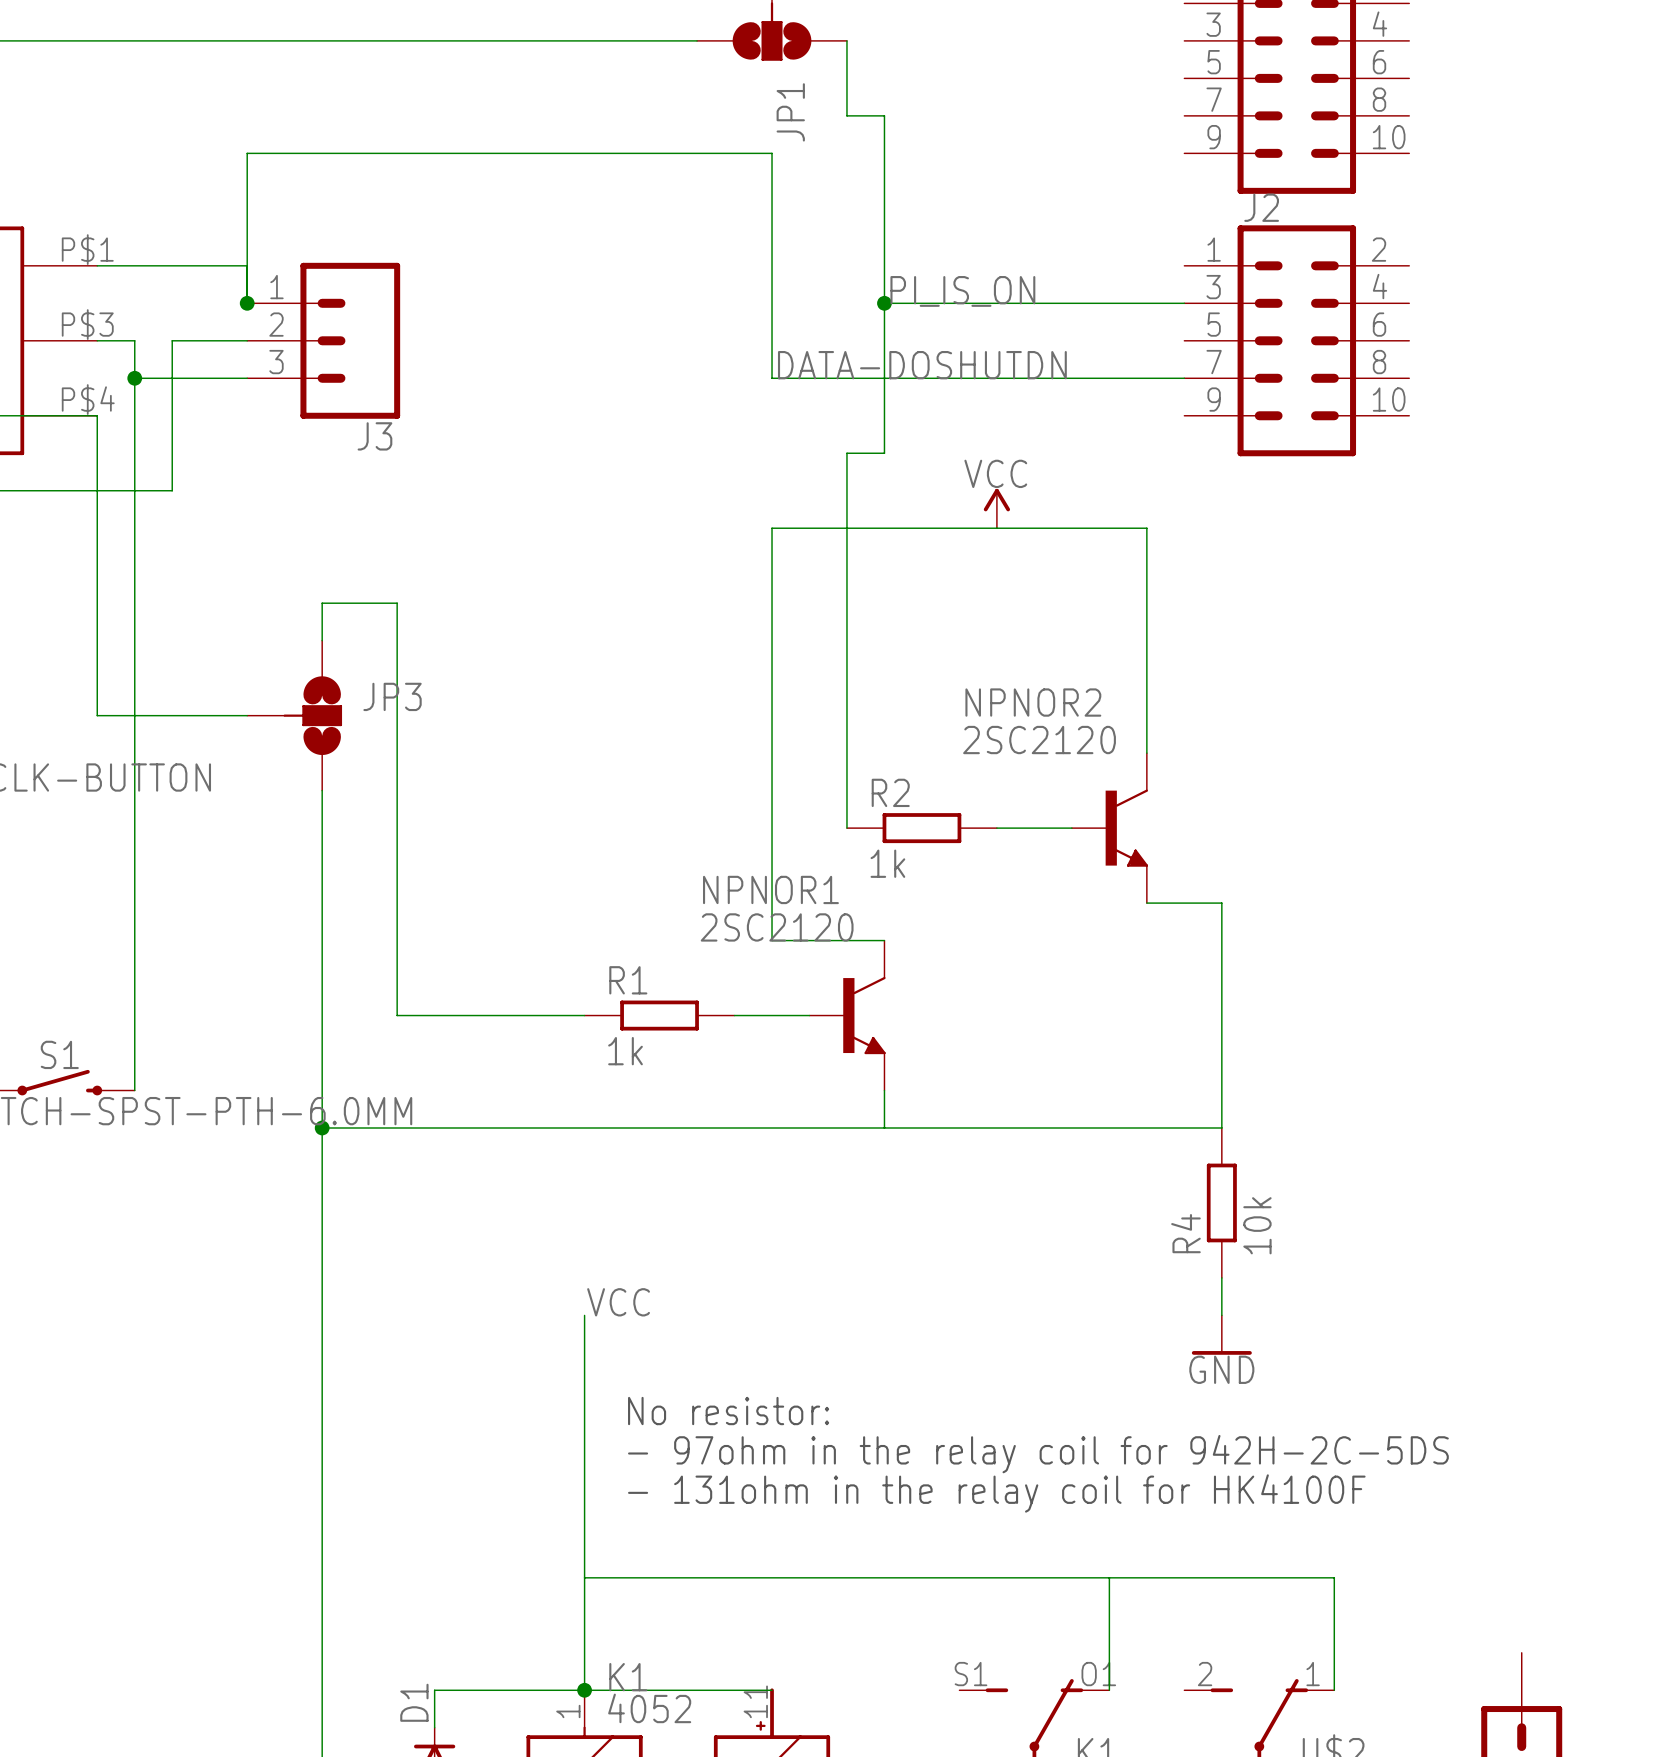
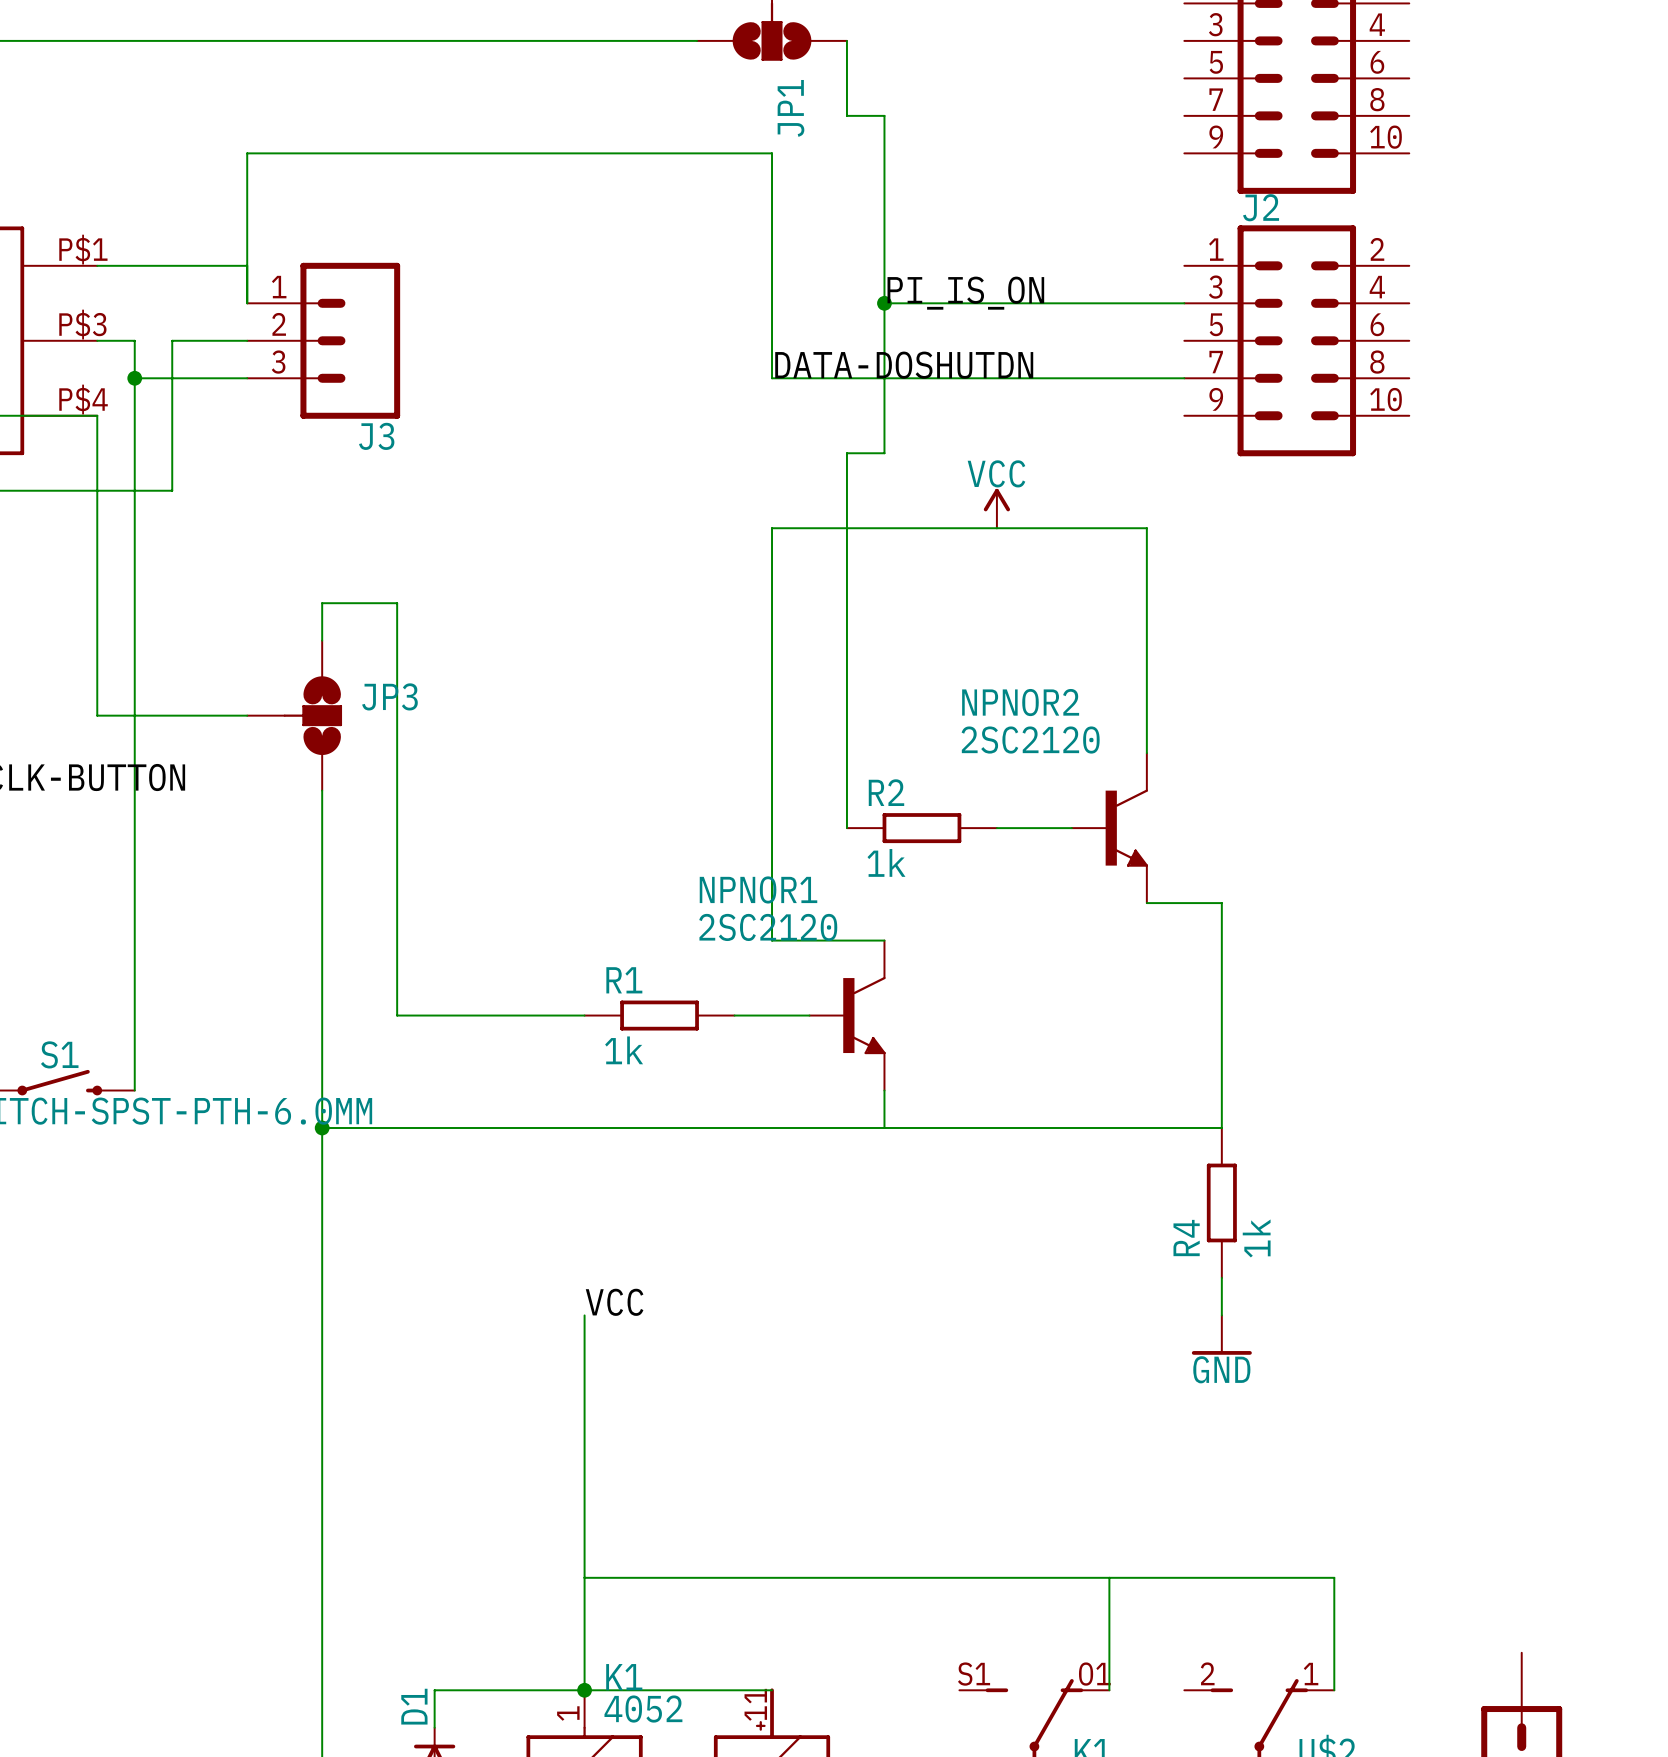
junction: (247, 303) -> none
R4 value: 10k (1257, 1225) -> 1k (1256, 1238)
text: No resistor: (728, 1411) -> none
text: - 97ohm in the relay coil for 942H-2C-5DS (1038, 1454) -> none
text: - 131ohm in the relay coil for HK4100F (996, 1493) -> none

